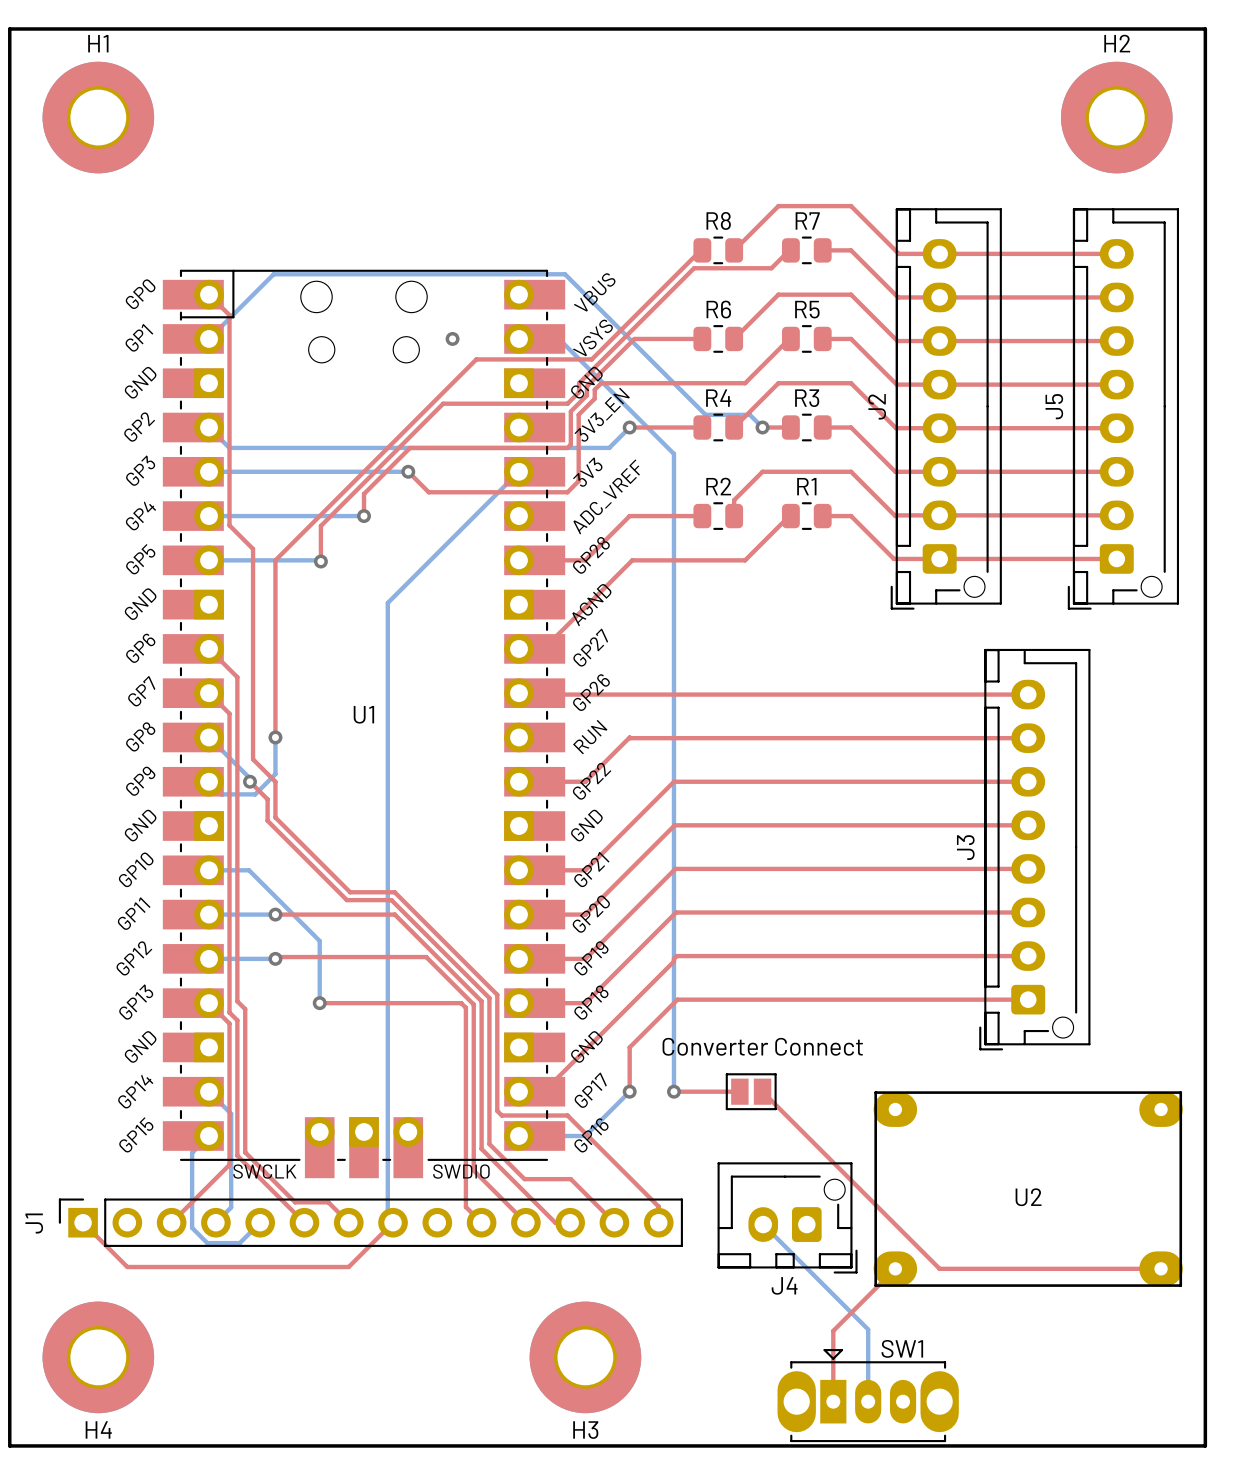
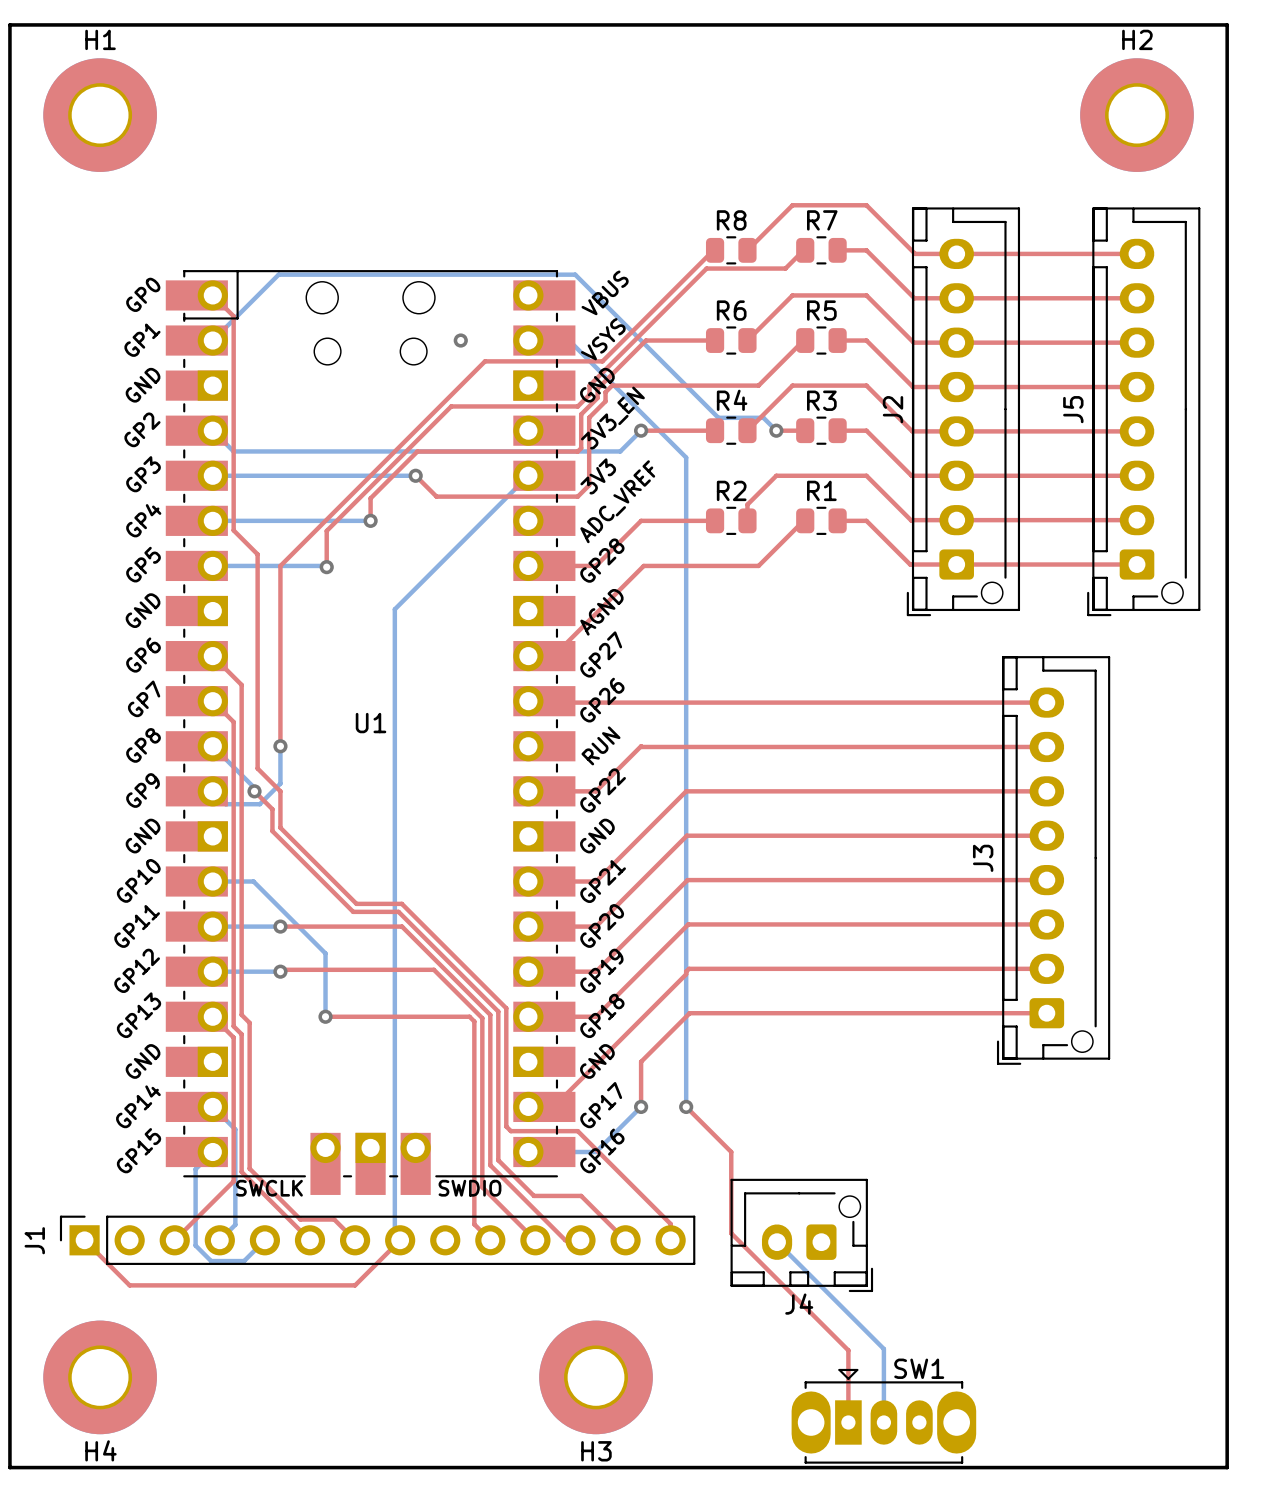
top track: (673, 1091) (739, 1091) -> (686, 1106) (731, 1152) (731, 1233) (848, 1350)
part: (751, 1091) -> none
top track: (762, 1091) (939, 1268) (1161, 1268) -> none
U2: (1028, 1189) -> none
top track: (895, 1268) (833, 1330) -> none

